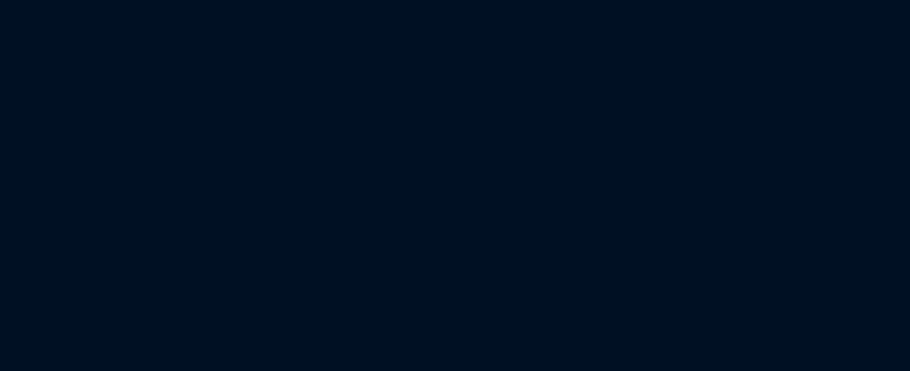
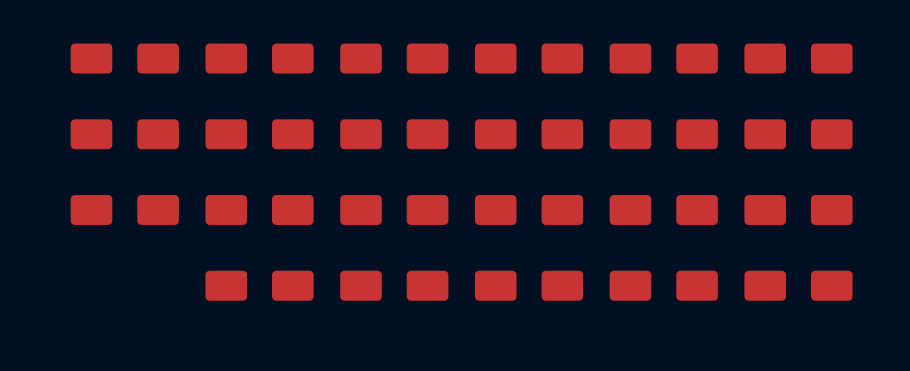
part: none -> (124, 58)
part: none -> (259, 58)
part: none -> (394, 58)
part: none -> (529, 58)
part: none -> (663, 58)
part: none -> (798, 58)
part: none -> (124, 134)
part: none -> (259, 134)
part: none -> (394, 134)
part: none -> (529, 134)
part: none -> (663, 134)
part: none -> (798, 134)
part: none -> (124, 209)
part: none -> (259, 209)
part: none -> (394, 209)
part: none -> (529, 209)
part: none -> (663, 209)
part: none -> (798, 209)
part: none -> (259, 285)
part: none -> (394, 285)
part: none -> (529, 285)
part: none -> (663, 285)
part: none -> (798, 285)

